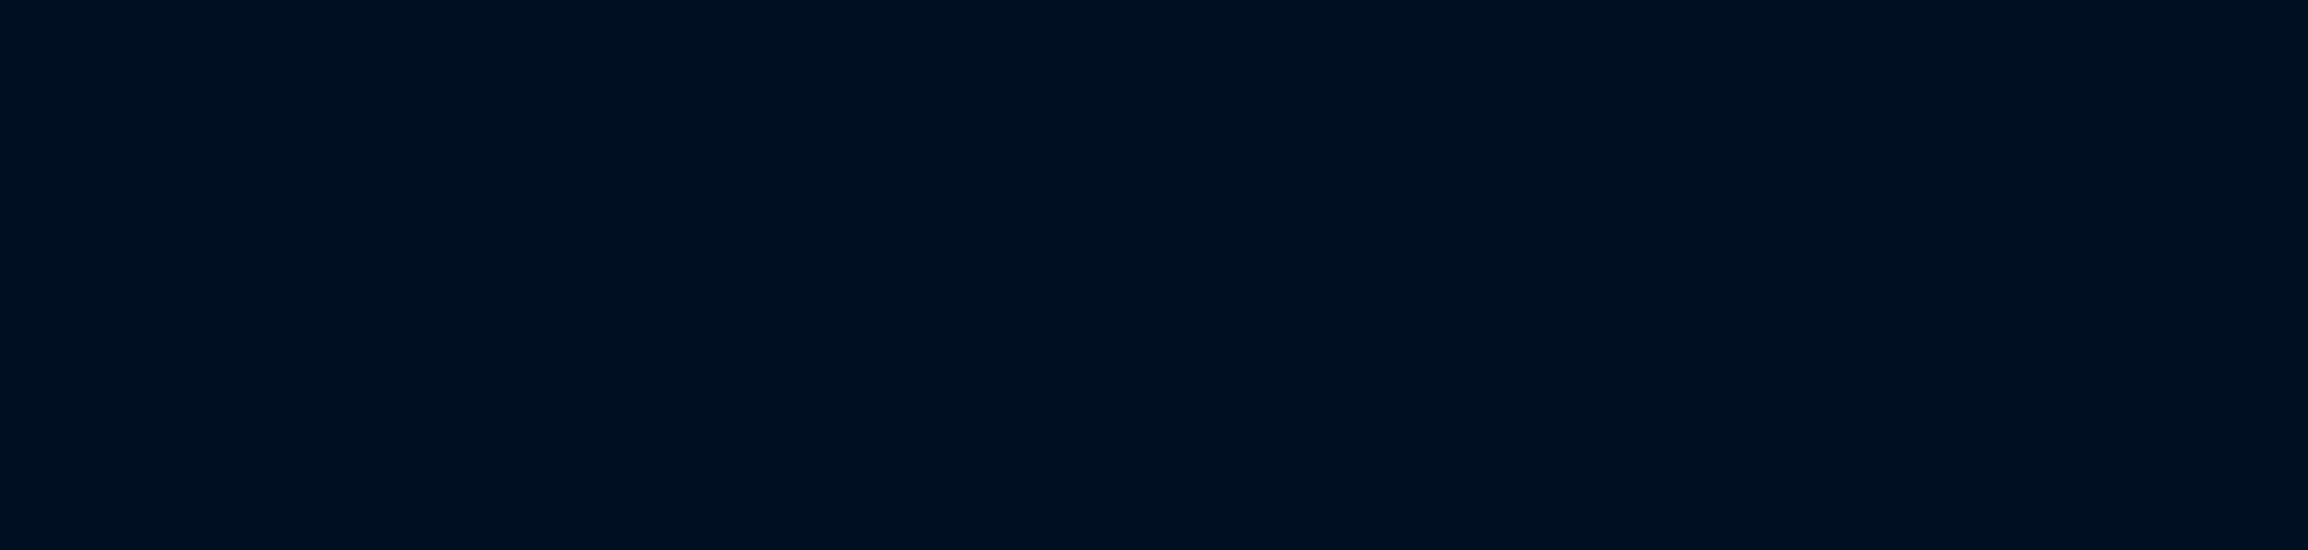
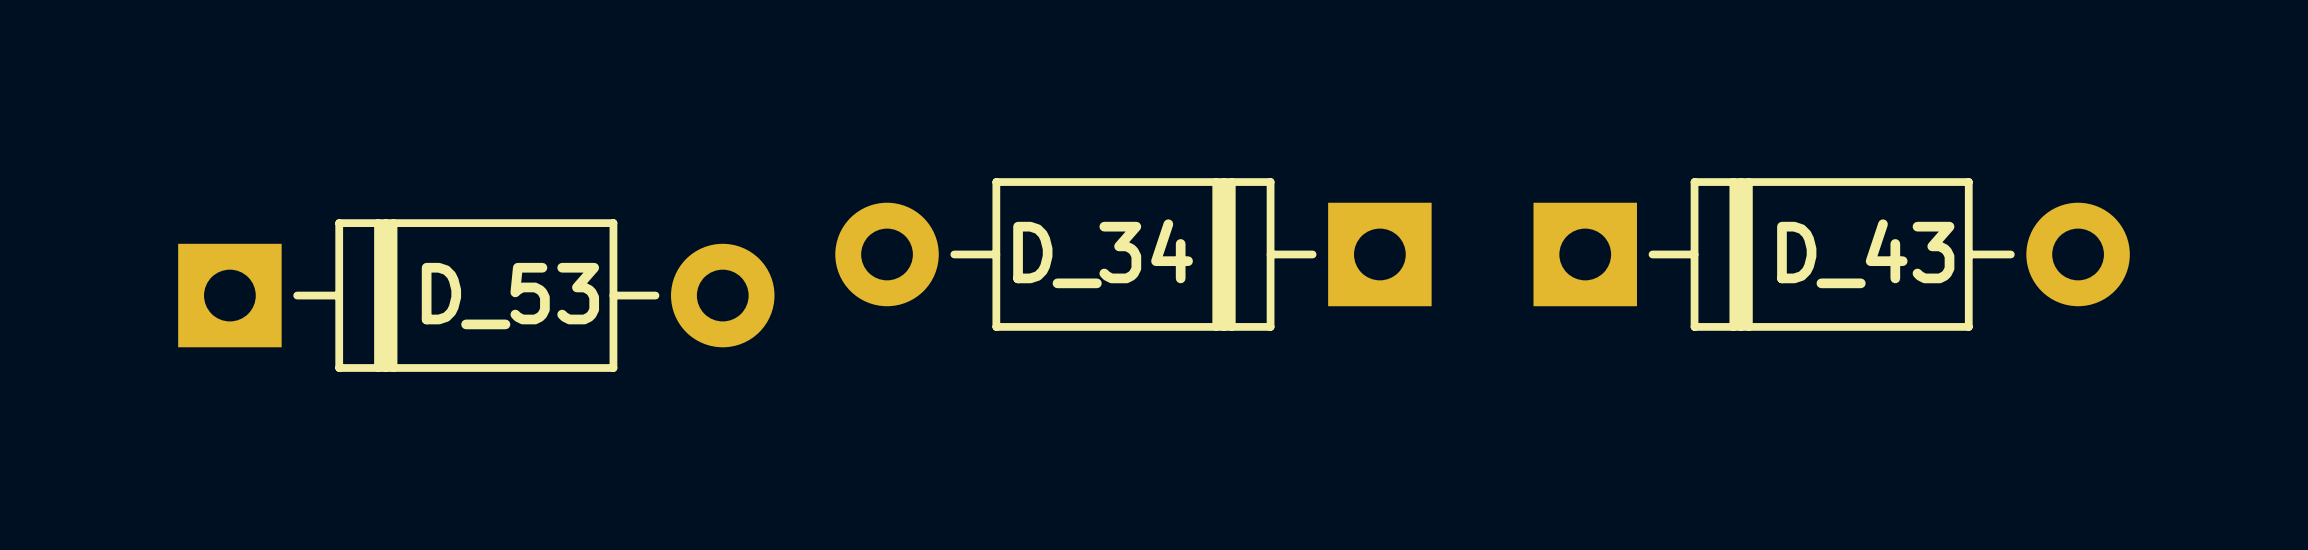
D_34: none -> (1133, 254)
D_43: none -> (1831, 254)
D_53: none -> (476, 295)

